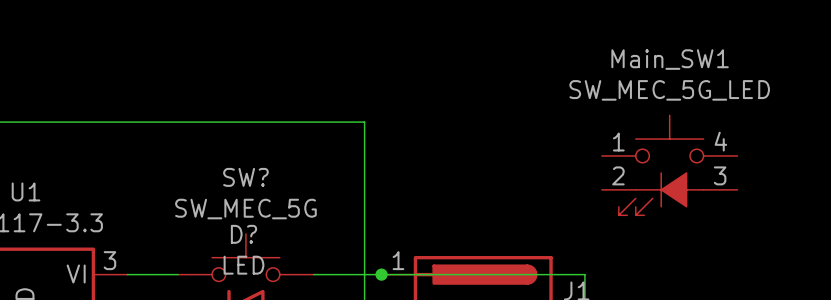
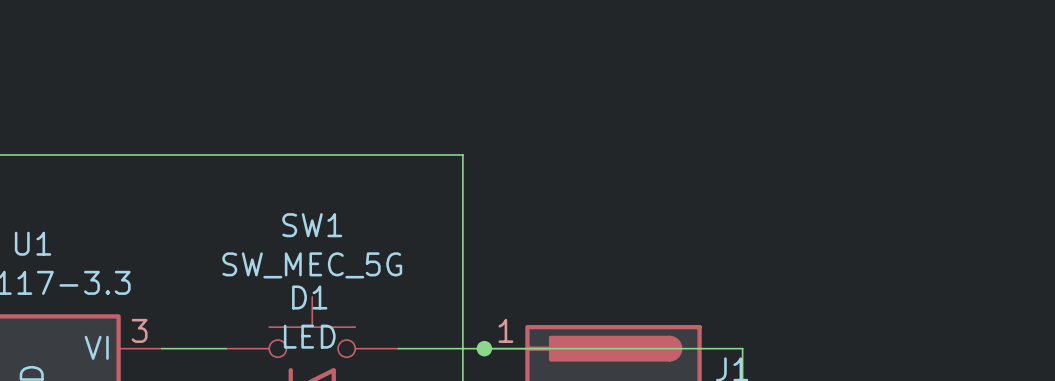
Main_SW1: SW_MEC_5G_LED (669, 165) -> none
SW? name: SW? (245, 177) -> SW1 (312, 225)
D? name: D? (243, 234) -> D1 (309, 297)

